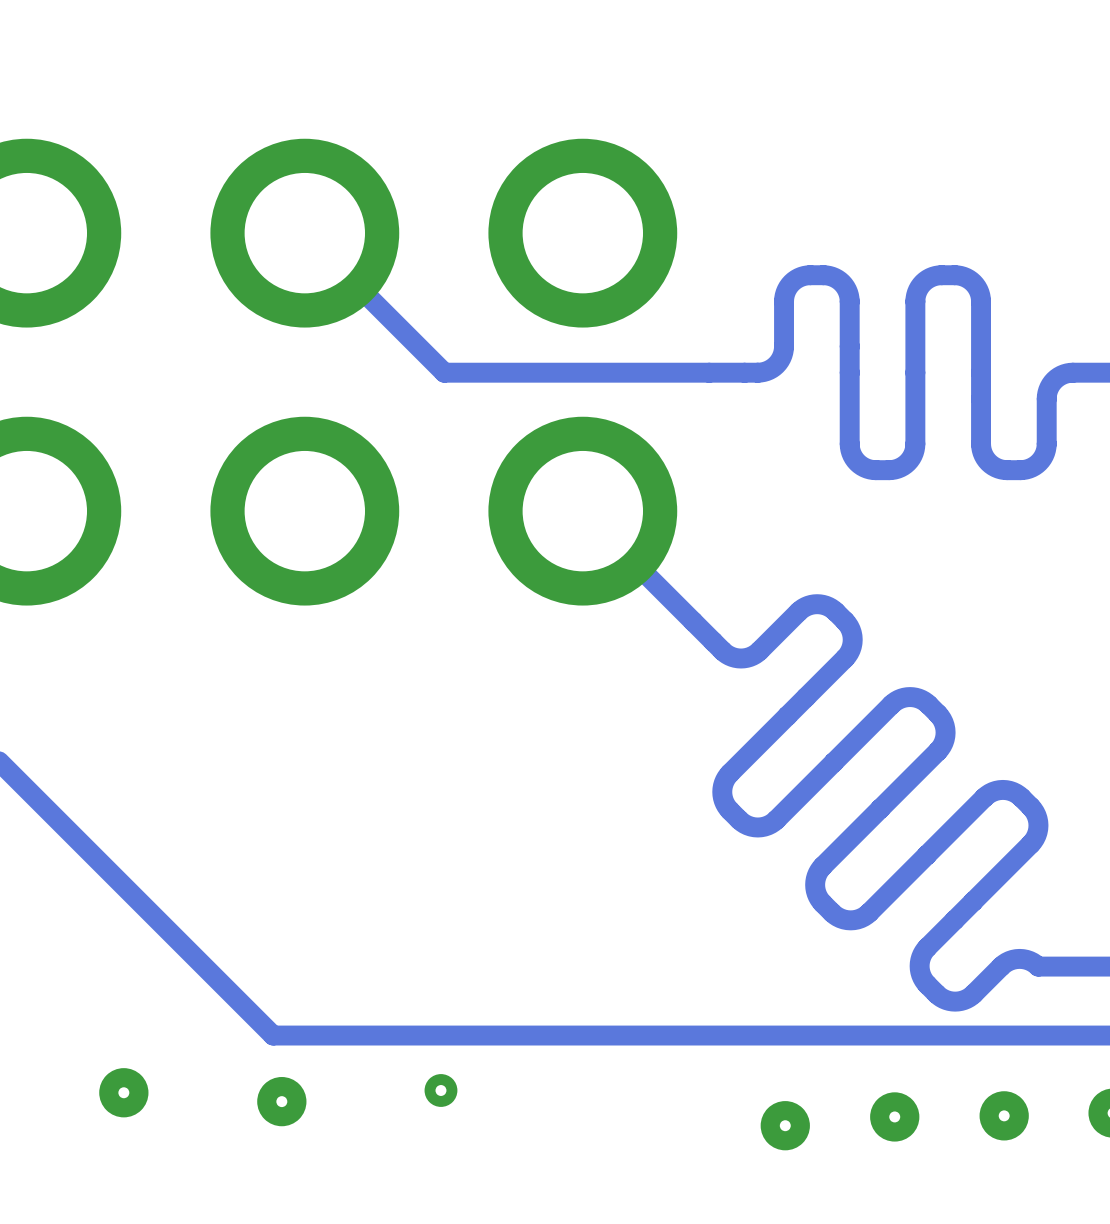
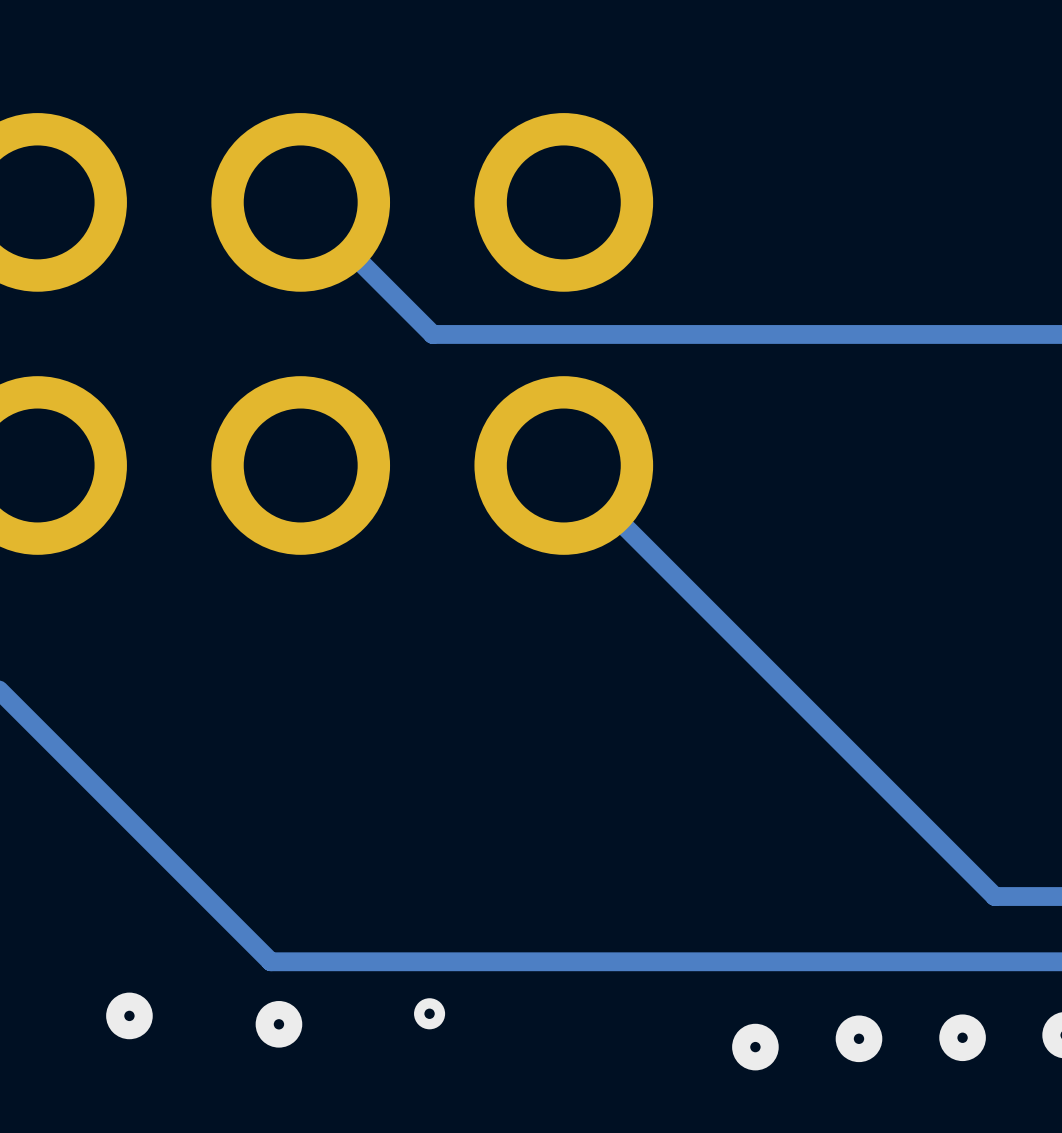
track: (1072, 372) (1059, 376) (1048, 390) (1046, 446) (1040, 460) (1034, 466) (1023, 470) (1004, 470) (993, 466) (985, 457) (981, 446) (979, 292) (973, 282) (963, 276) (941, 275) (930, 277) (919, 287) (915, 298) (913, 452) (907, 462) (897, 468) (867, 468) (855, 460) (849, 446) (849, 295) (839, 280) (823, 275) (801, 276) (788, 287) (784, 298) (782, 355) (771, 368) (757, 372) -> (1027, 334) (729, 334)
track: (722, 650) (738, 658) (752, 655) (800, 609) (814, 604) (823, 604) (833, 609) (847, 623) (852, 636) (851, 646) (845, 658) (724, 780) (722, 794) (726, 805) (741, 822) (751, 826) (761, 827) (773, 822) (898, 699) (910, 697) (921, 699) (937, 714) (943, 722) (945, 736) (940, 748) (819, 870) (815, 881) (816, 893) (820, 901) (832, 912) (847, 920) (857, 919) (866, 914) (986, 795) (996, 790) (1009, 790) (1018, 795) (1034, 812) (1038, 825) (1034, 838) (925, 949) (920, 960) (919, 969) (923, 980) (936, 993) (943, 999) (955, 1001) (971, 995) (1001, 966) (1009, 960) (1026, 959) (1038, 966) -> (695, 597) (994, 896)

